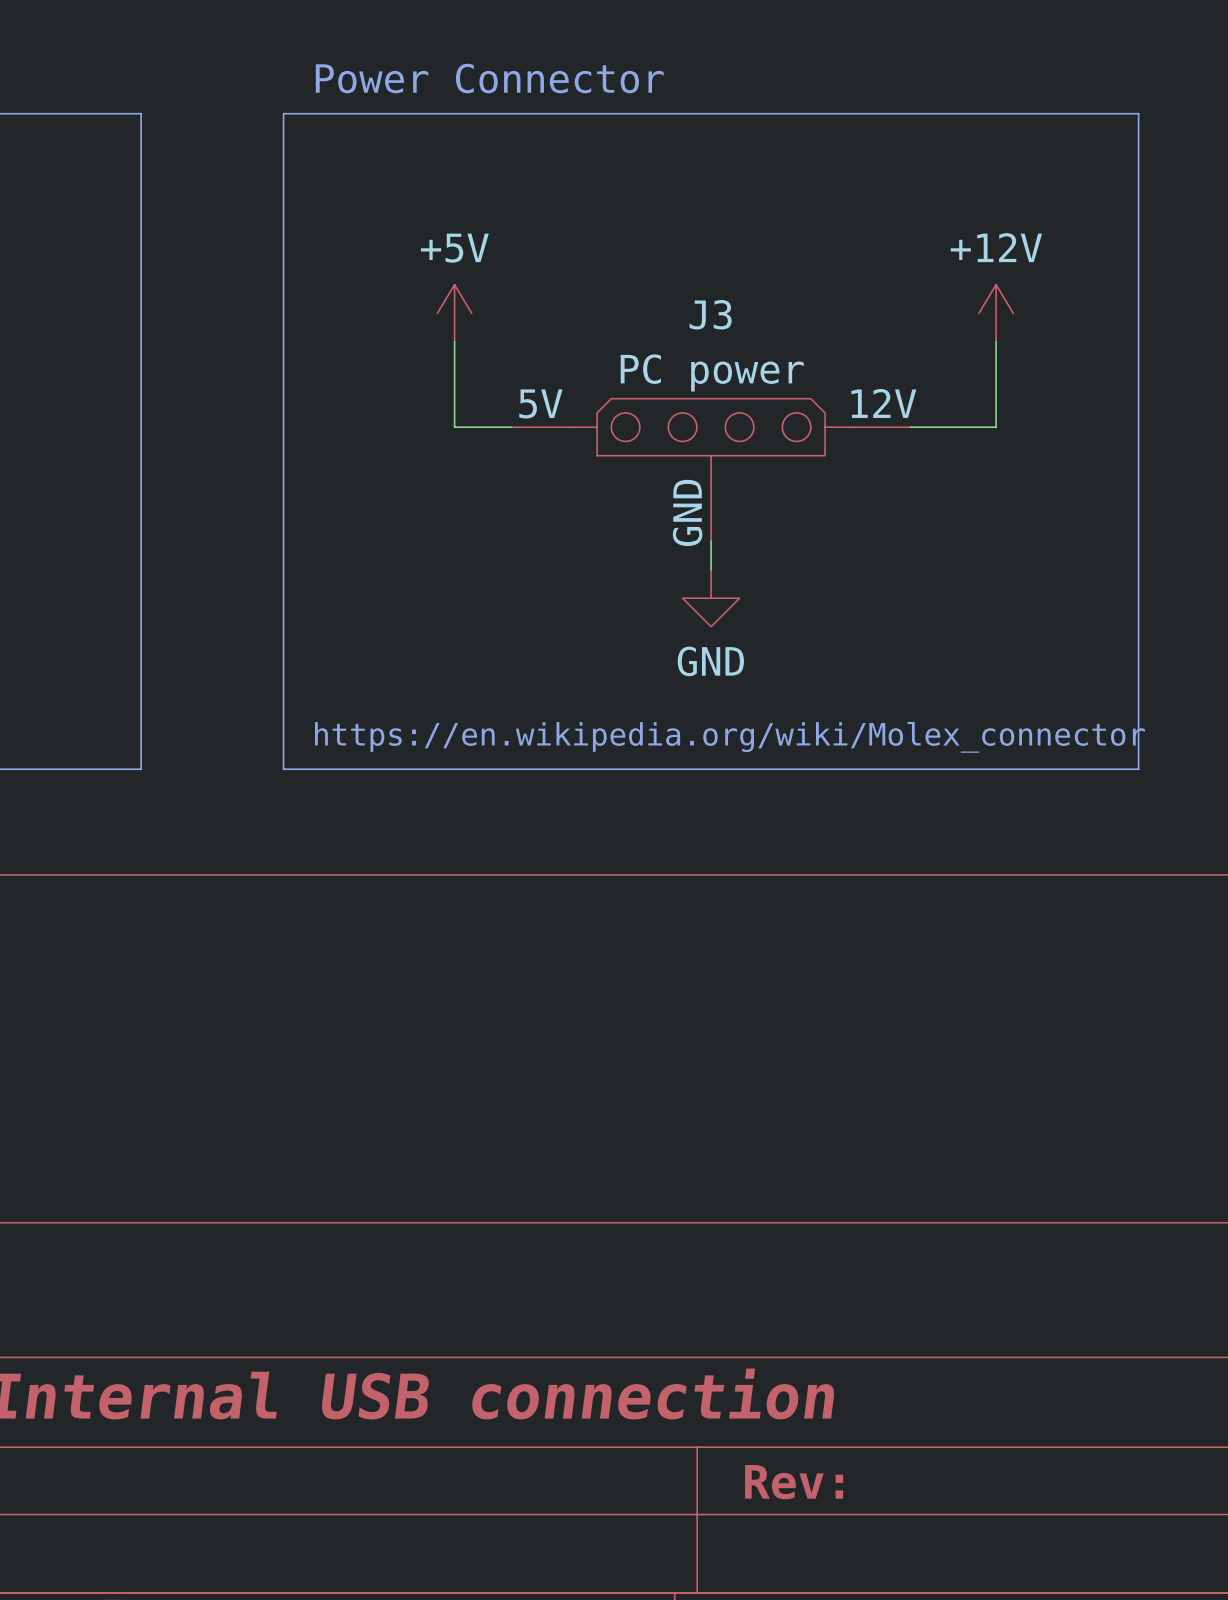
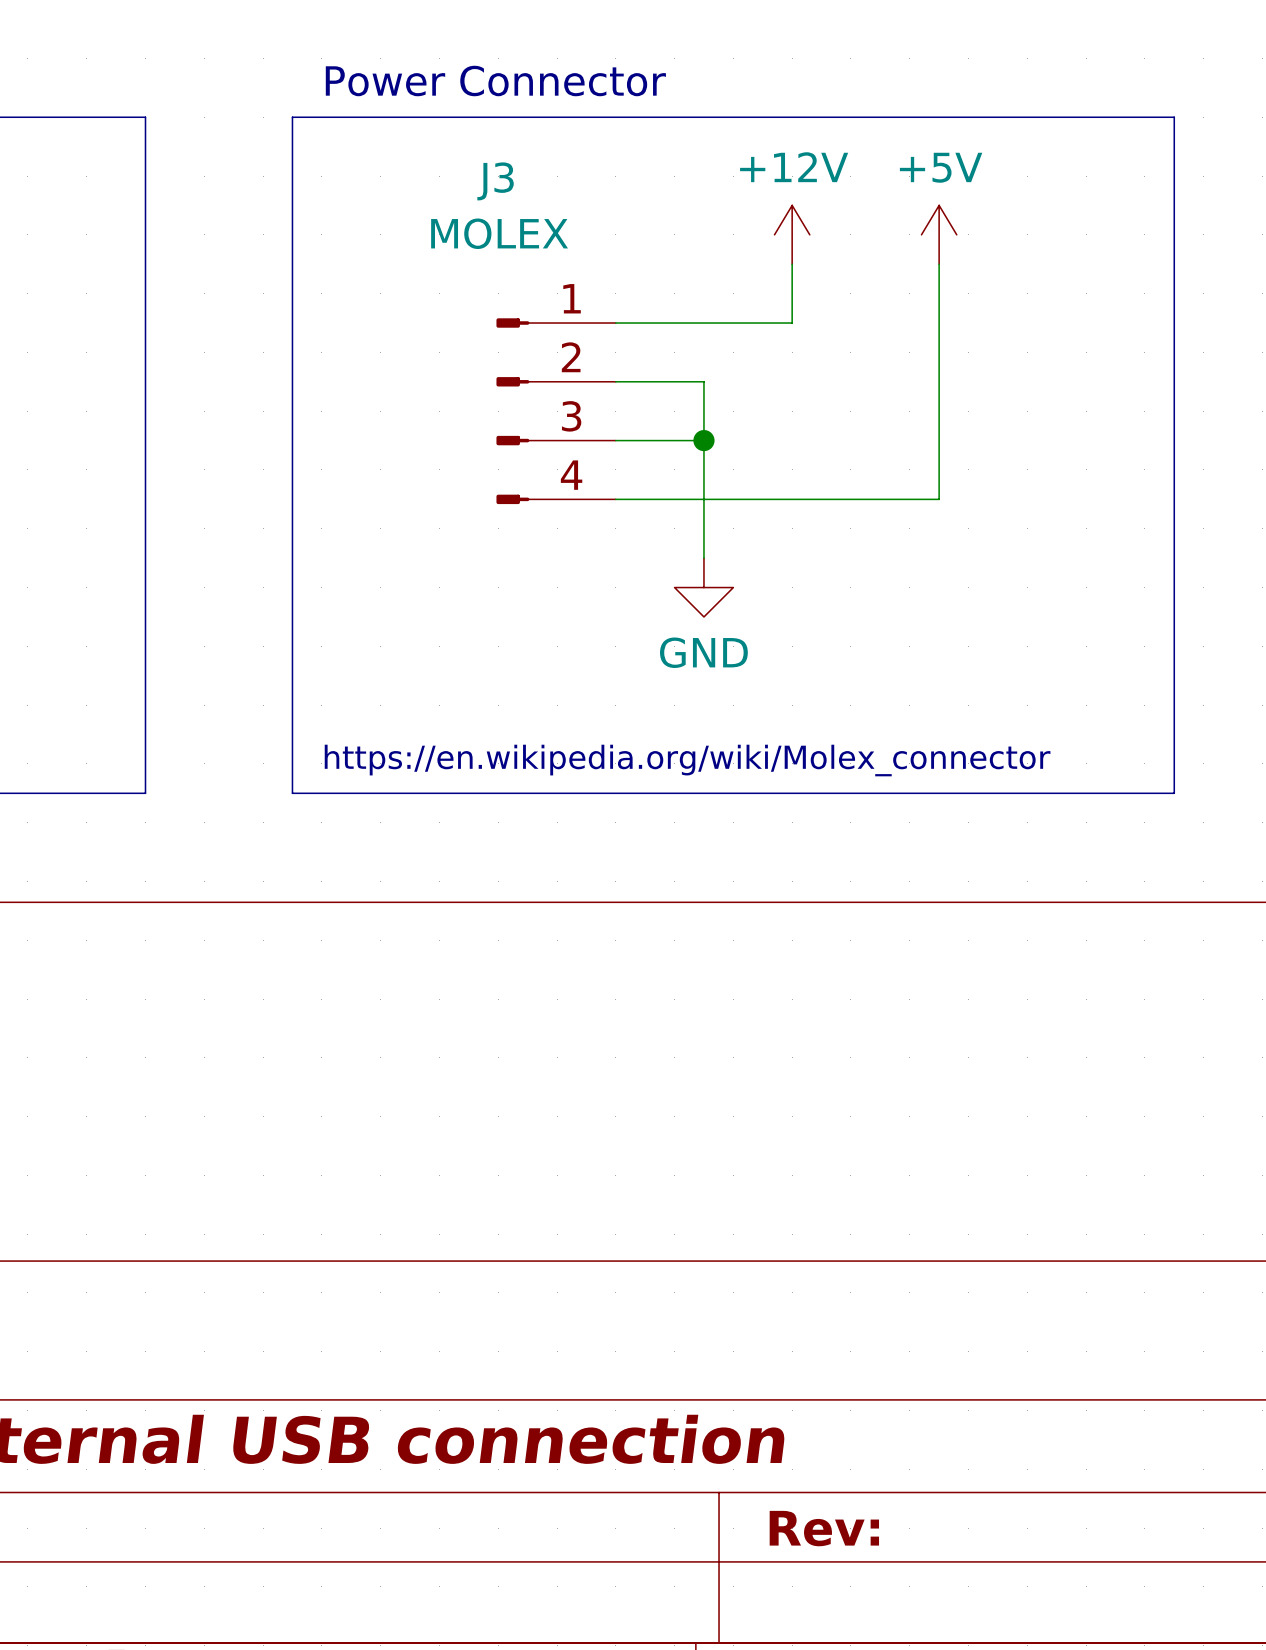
wire: none -> (792, 264) (792, 323) (615, 323)
wire: none -> (939, 264) (939, 499) (615, 499)
power symbol position: +5V (454, 313) -> +5V (939, 234)
power symbol position: +12V (996, 313) -> +12V (792, 234)
J3 name position: J3 (710, 314) -> J3 (495, 181)
wire: (454, 341) (454, 427) (511, 427) -> none
wire: (996, 341) (996, 427) (910, 427) -> none
wire: none -> (615, 381) (703, 381) (703, 558)
J3 value: PC power (712, 372) -> MOLEX (499, 233)
J3 symbol: [511, 398, 911, 542] -> [496, 318, 616, 505]
wire: none -> (615, 440) (703, 440)
junction: none -> (703, 440)
wire: (711, 541) (711, 569) -> none
power symbol position: GND (711, 598) -> GND (703, 587)

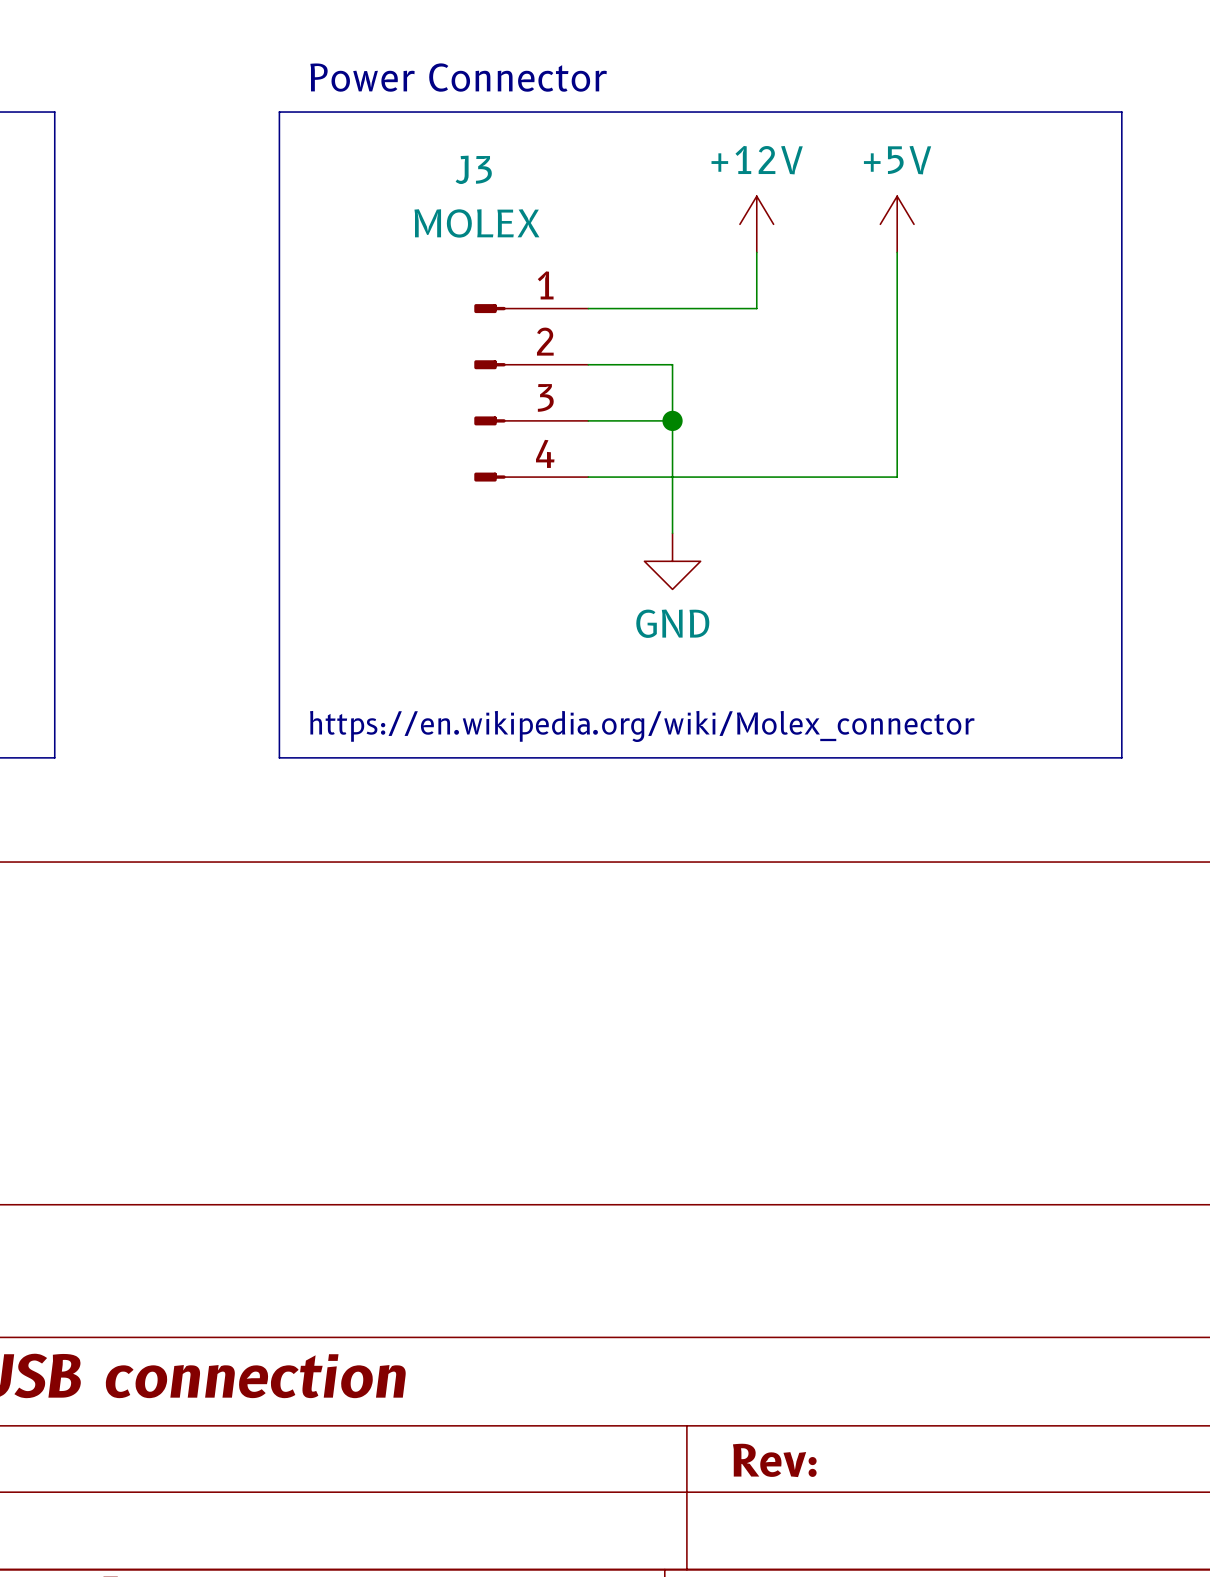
line: (57, 117) (145, 117) (145, 793) (57, 793) -> (54, 112) (54, 757)

